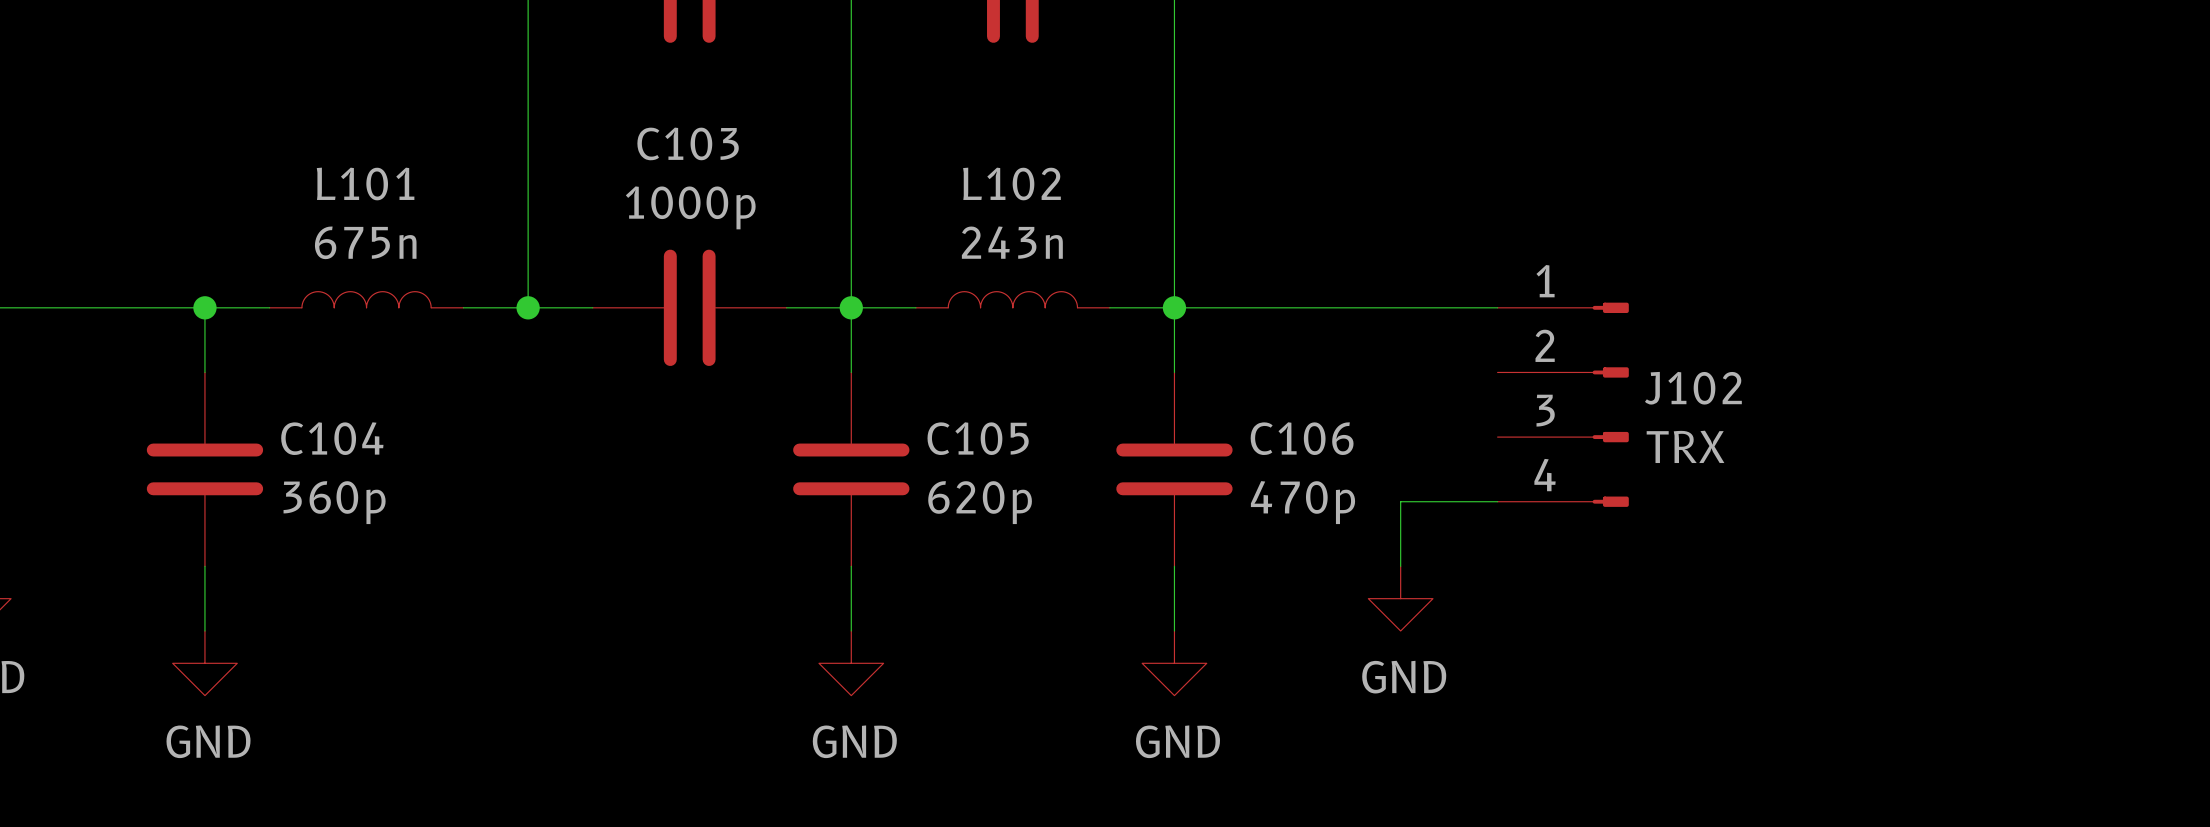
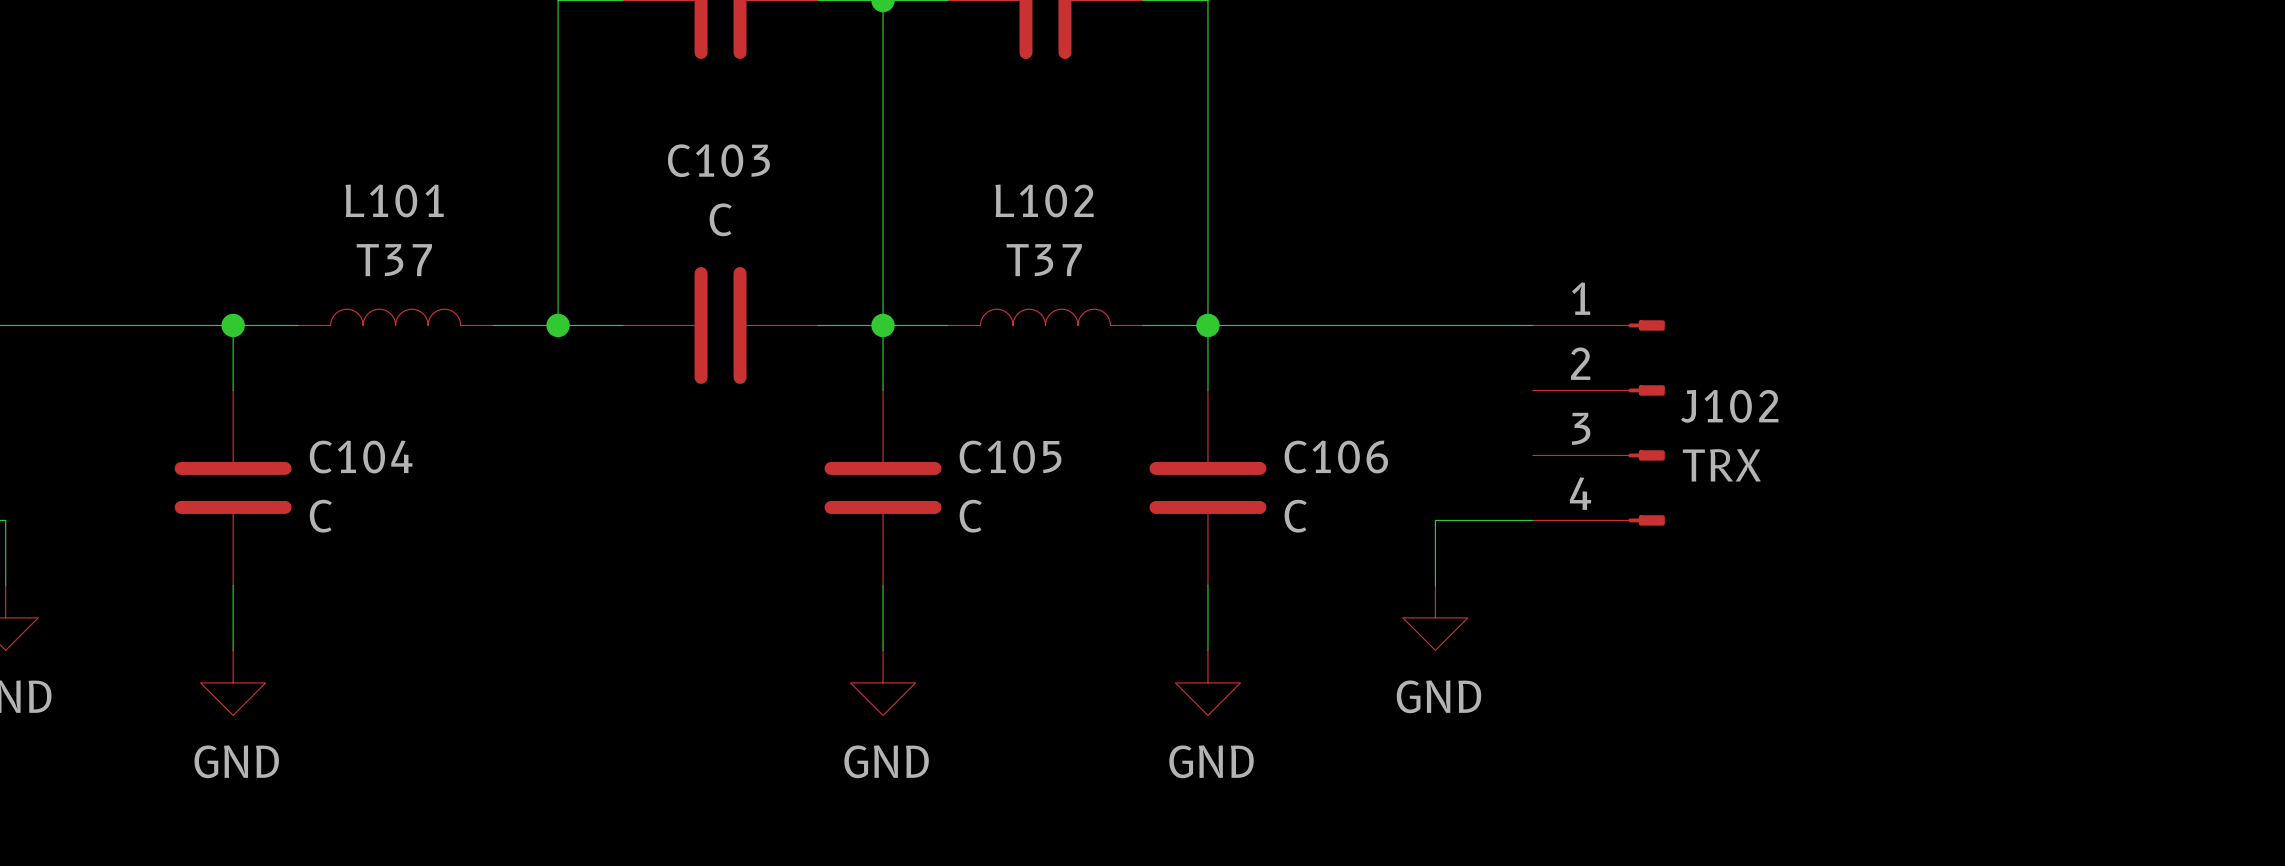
C103 value: 1000p (690, 207) -> C (720, 219)
L101 value: 675n (365, 242) -> T37 (394, 260)
L102 value: 243n (1012, 242) -> T37 (1044, 260)
C104 value: 360p (334, 502) -> C (320, 516)
C105 value: 620p (980, 502) -> C (970, 516)
C106 value: 470p (1302, 502) -> C (1295, 516)

